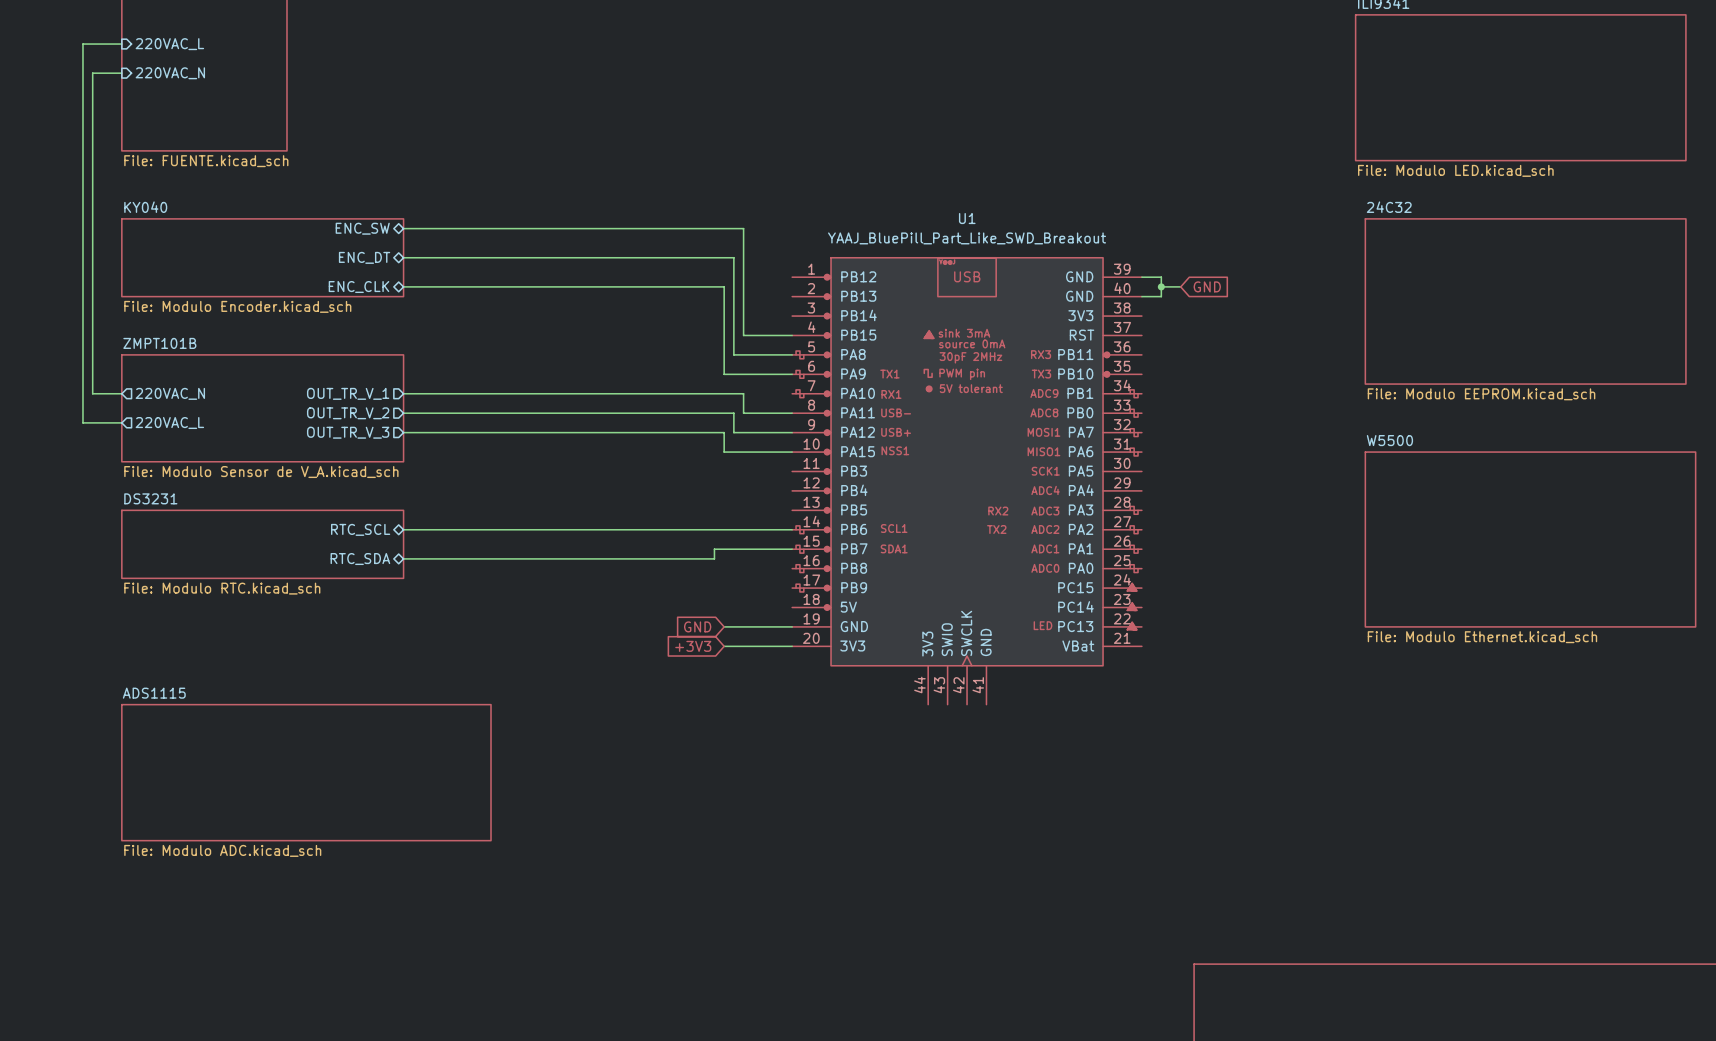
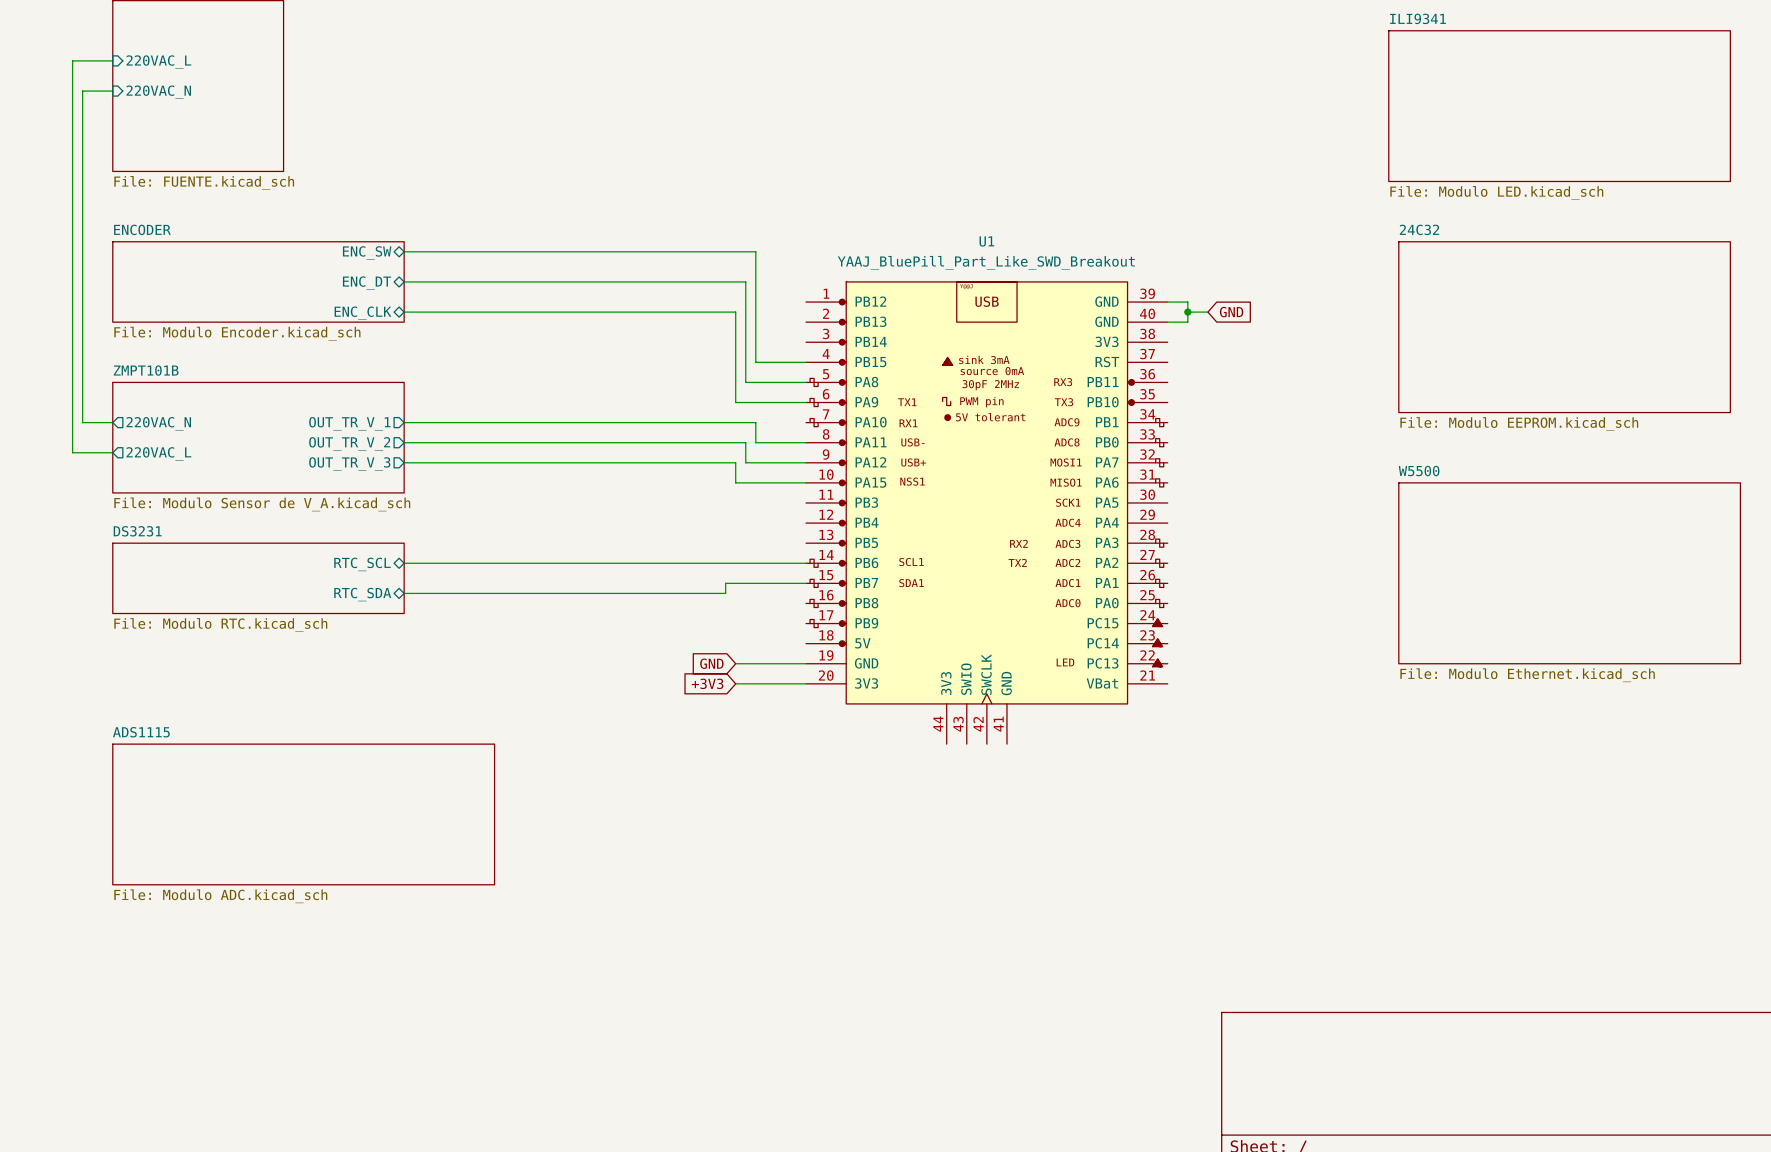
sheet KY040 name: KY040 (145, 207) -> ENCODER (142, 229)

